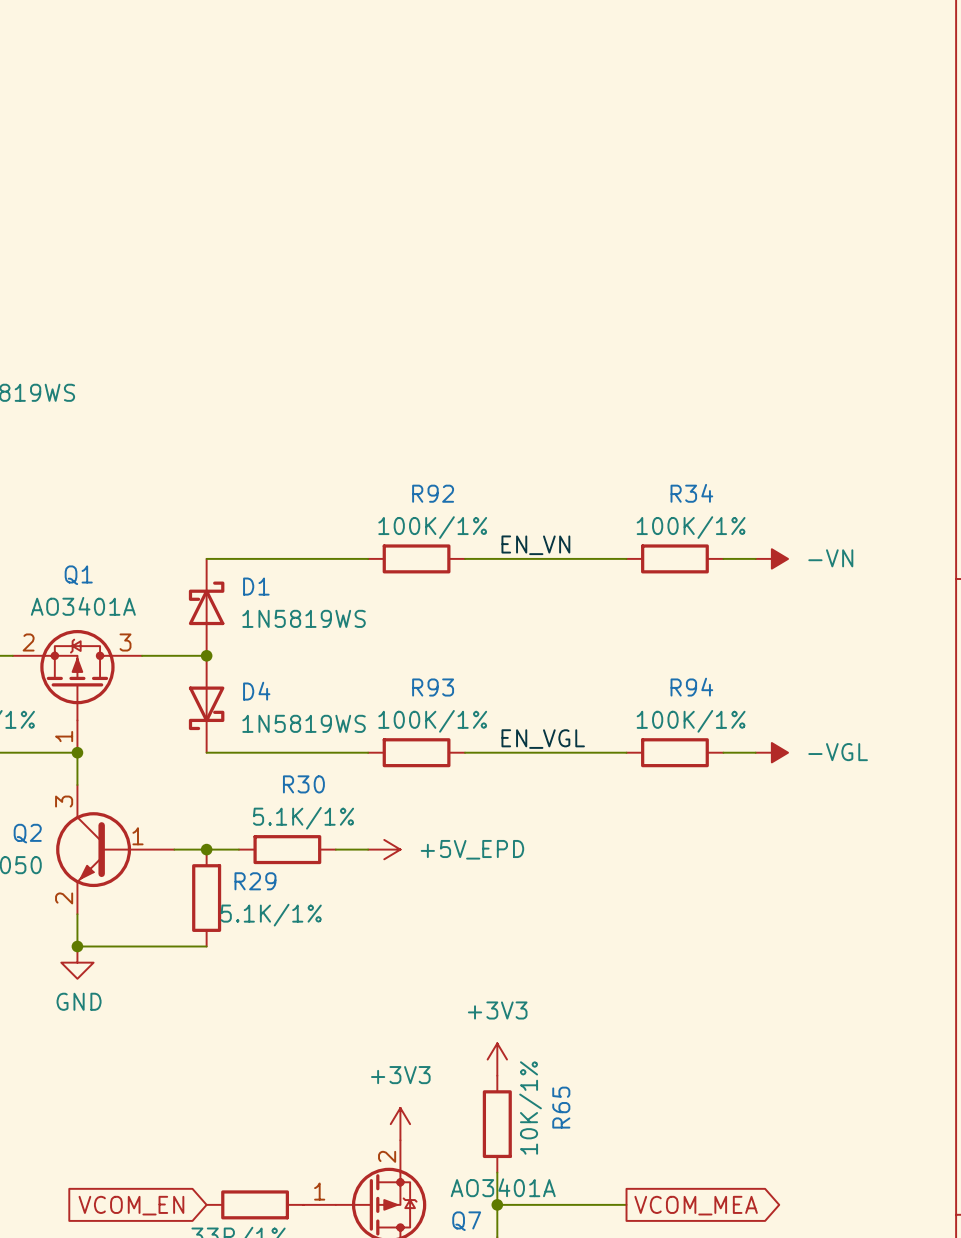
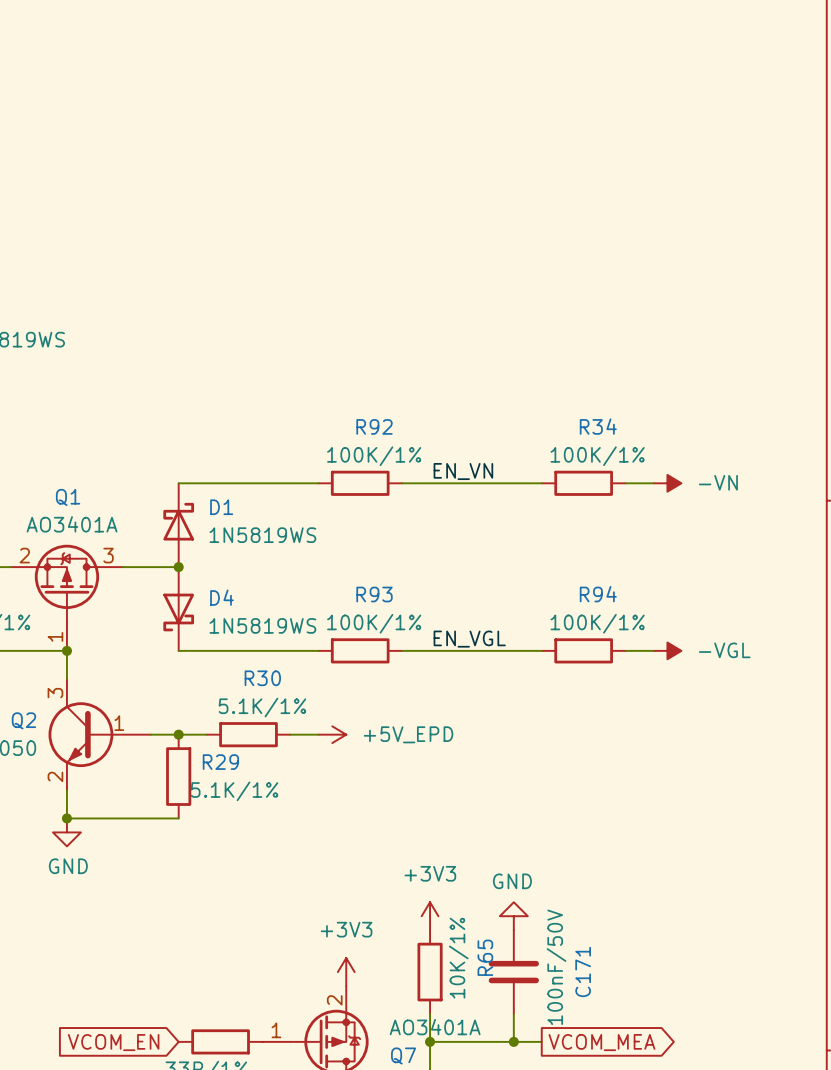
power symbol: none -> GND (513, 916)
C171: none -> 100nF/50V (513, 972)
wire: none -> (513, 1013) (513, 1041)
junction: none -> (513, 1041)

